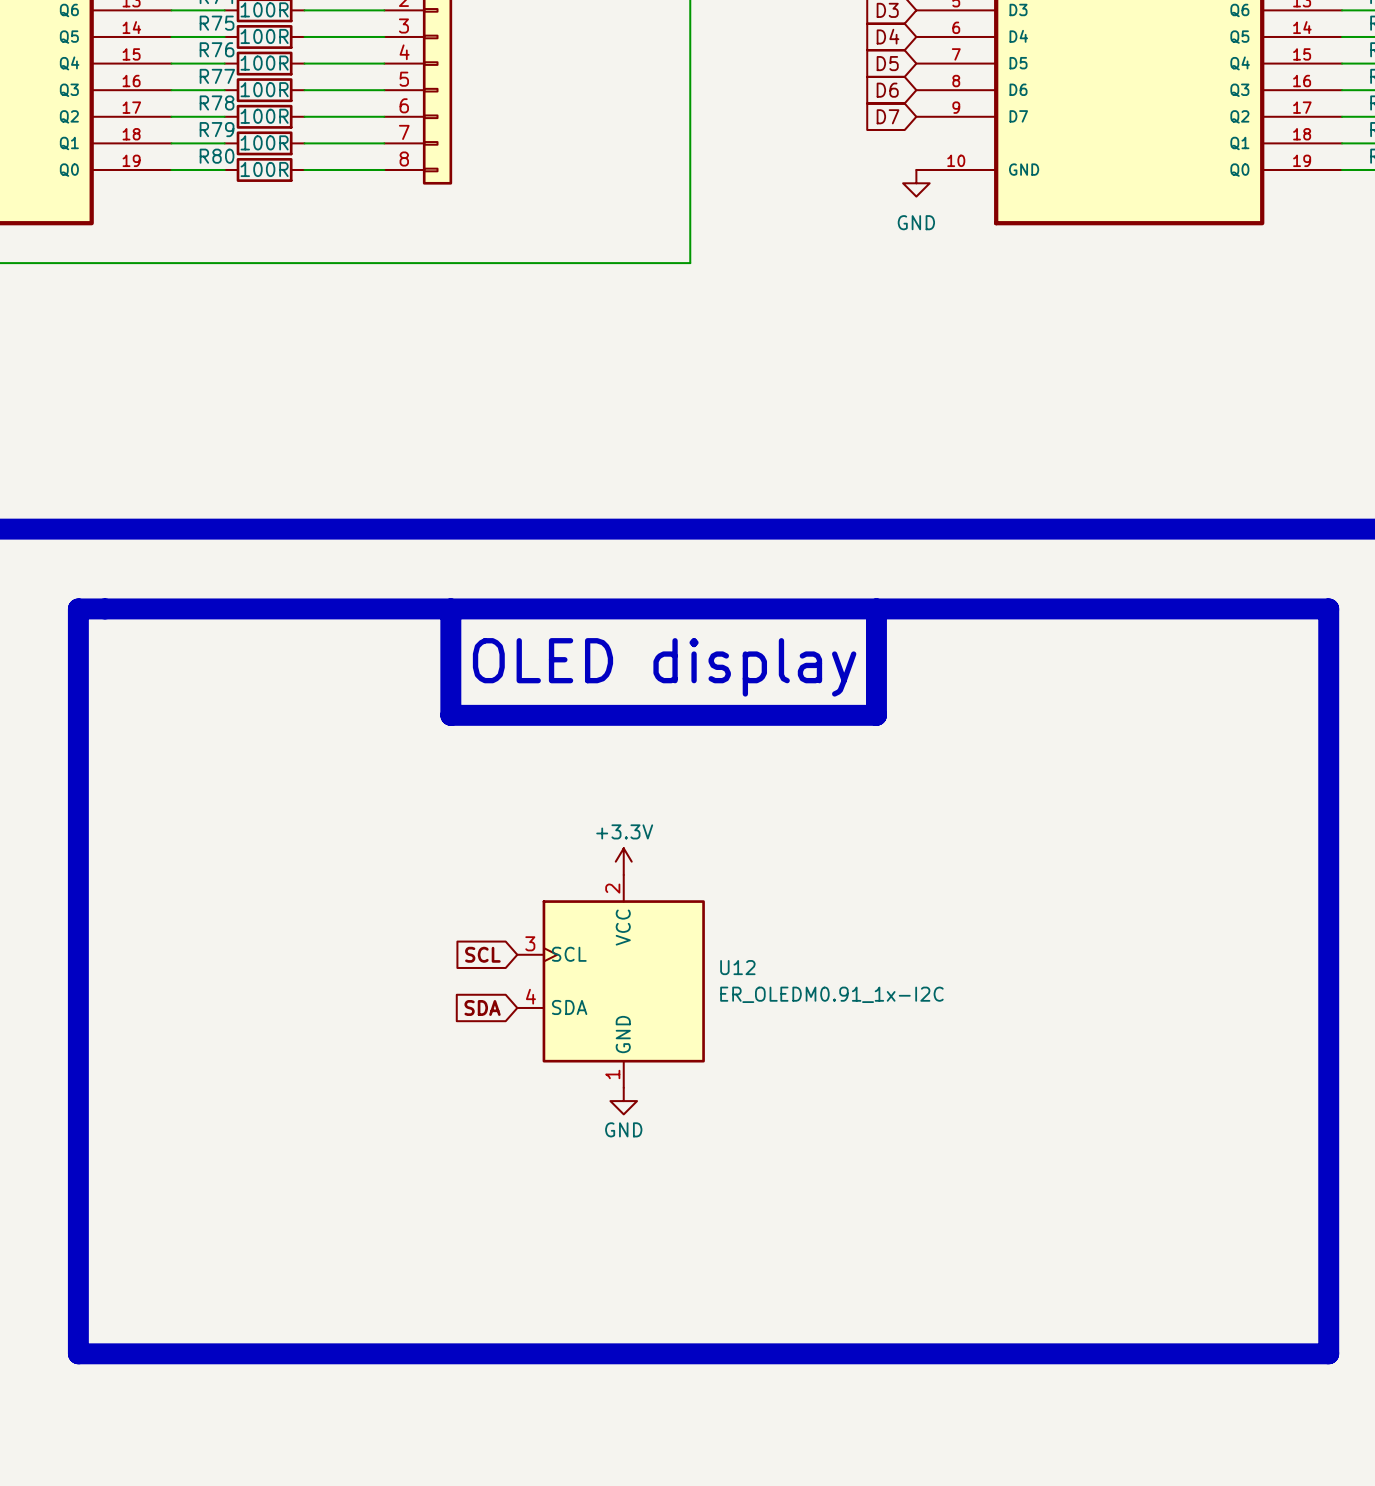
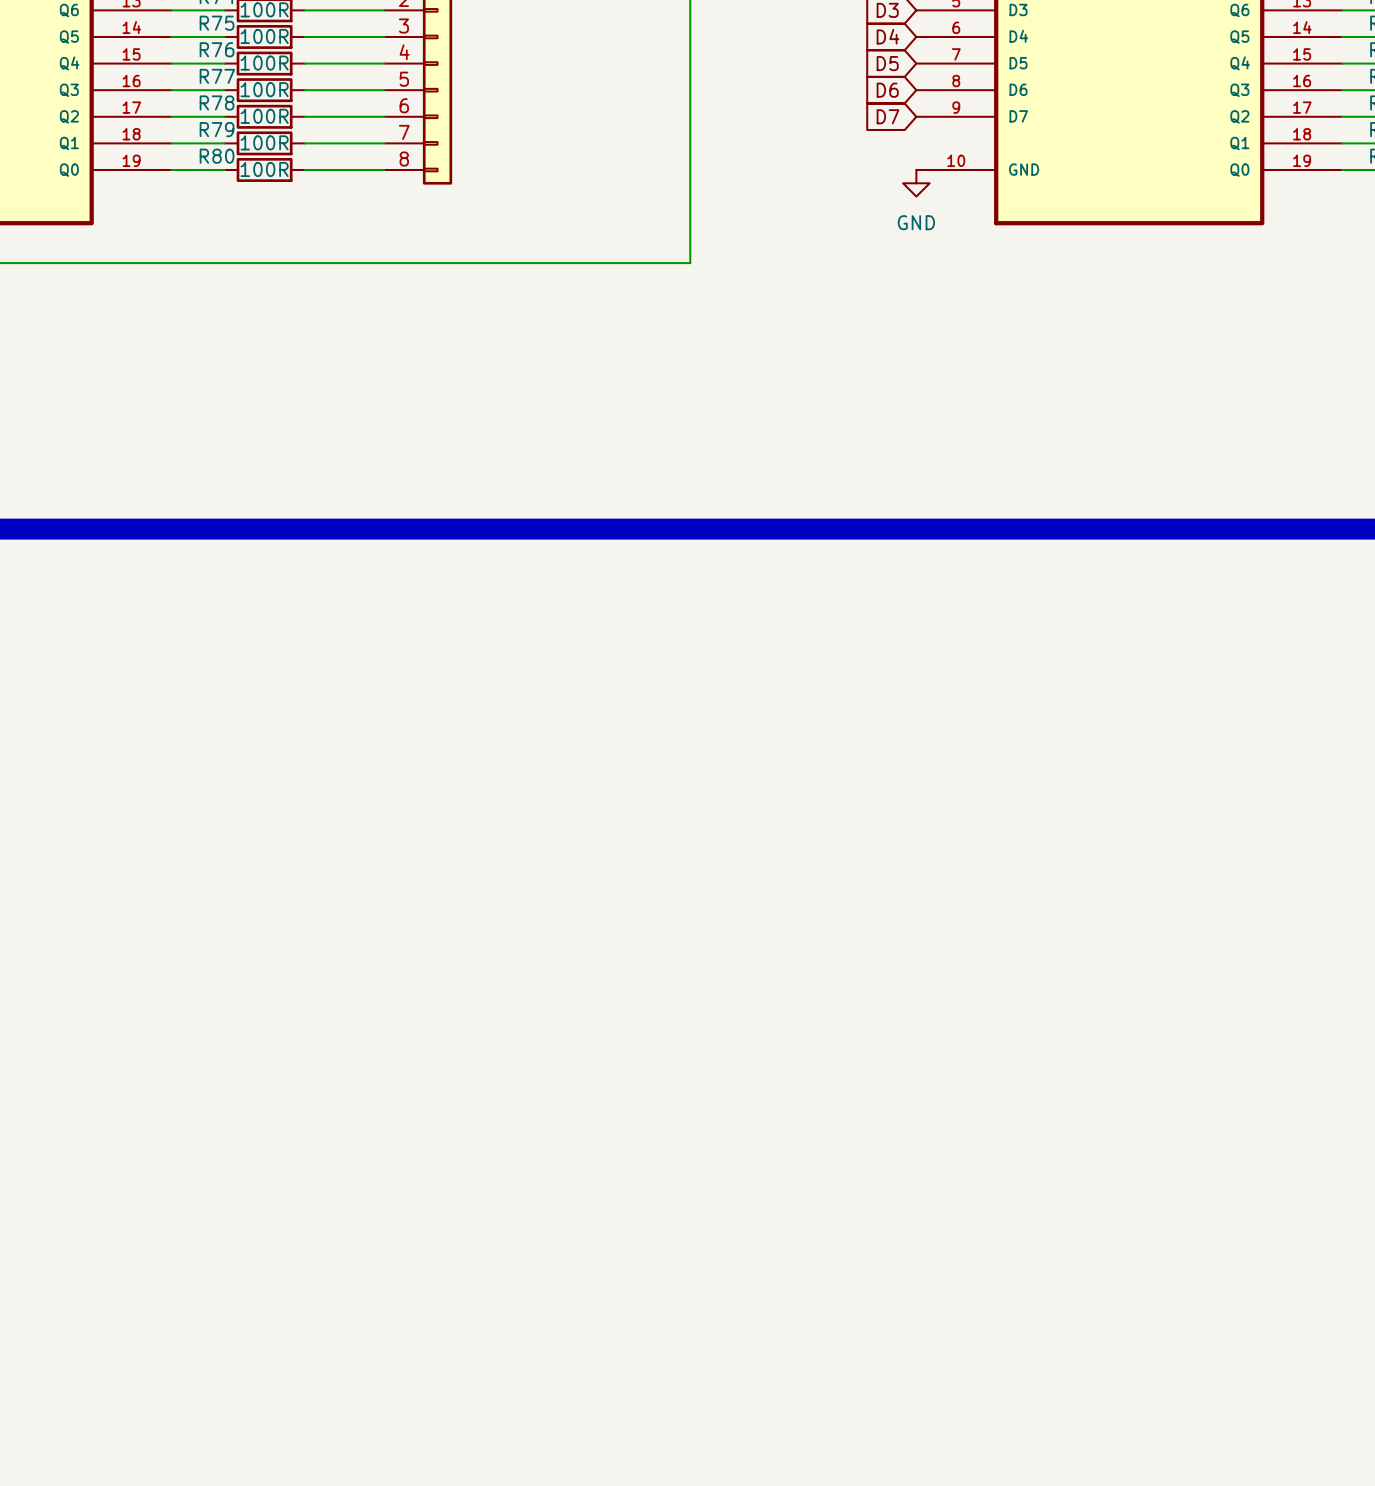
line: (78, 608) (1328, 608) (1328, 1353) (78, 1353) (78, 608) -> none
line: (450, 608) (450, 715) (876, 715) (876, 608) -> none
text: OLED display (664, 667) -> none
power symbol: +3.3V (623, 861) -> none
global label: SCL (482, 954) -> none
U12: ER_OLEDM0.91_1x-I2C (611, 981) -> none
global label: SDA (482, 1007) -> none
power symbol: GND (623, 1101) -> none

